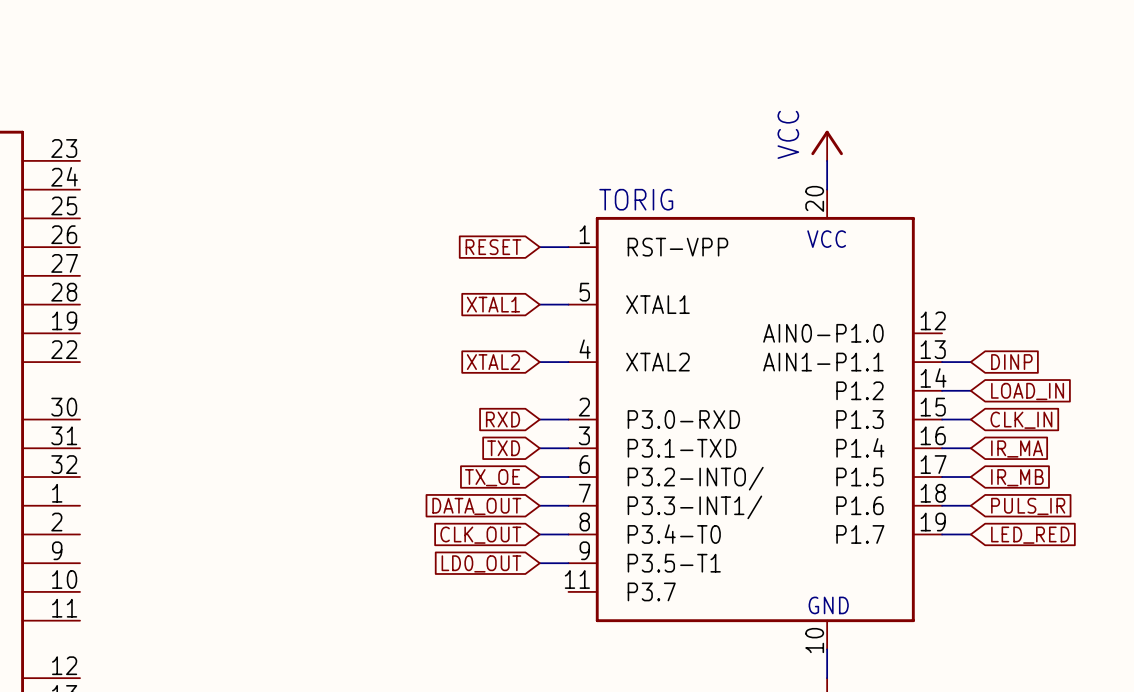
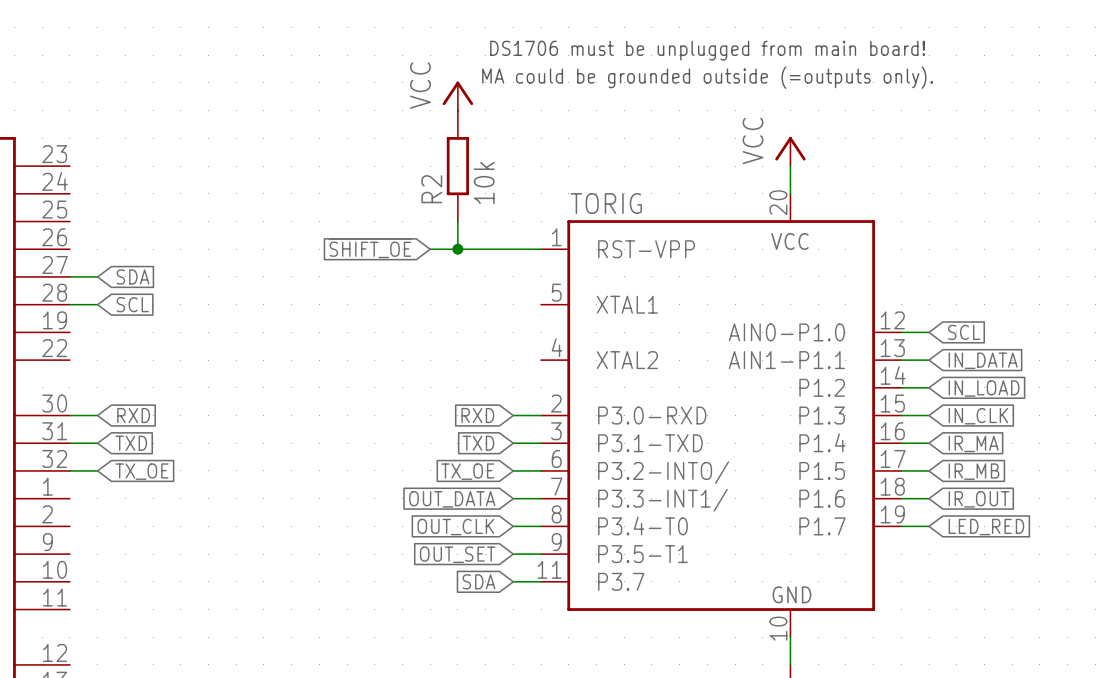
text: none -> DS1706 must be unplugged from main board! (707, 50)
text: none -> MA could be grounded outside (=outputs only). (707, 77)
power symbol: none -> VCC (457, 96)
R2: none -> 10k (457, 166)
wire: none -> (457, 221) (457, 249)
global label: none -> ~{SHIFT_OE} (370, 248)
wire: none -> (430, 249) (513, 249)
junction: none -> (457, 249)
global label: RESET (493, 247) -> none
wire: none -> (69, 276) (97, 276)
global label: none -> SDA (133, 276)
wire: none -> (69, 304) (97, 304)
global label: none -> SCL (132, 304)
global label: XTAL1 (493, 304) -> none
wire: (539, 304) (568, 304) -> none
wire: none -> (901, 332) (929, 332)
global label: none -> SCL (964, 332)
global label: XTAL2 (493, 362) -> none
wire: (539, 362) (568, 362) -> (513, 581) (541, 581)
global label: DINP (1011, 362) -> IN_DATA (983, 360)
global label: LOAD_IN (1027, 391) -> IN_LOAD (984, 388)
wire: none -> (69, 415) (97, 415)
global label: none -> RXD (133, 415)
global label: CLK_IN (1021, 420) -> IN_CLK (978, 416)
wire: none -> (69, 443) (97, 443)
global label: none -> TXD (131, 443)
wire: none -> (69, 470) (97, 470)
global label: none -> TX_OE (141, 471)
global label: DATA_OUT (476, 506) -> OUT_DATA (452, 499)
global label: PULS_IR (1028, 506) -> IR_OUT (979, 499)
global label: CLK_OUT (480, 535) -> OUT_CLK (455, 527)
global label: LD0_OUT (481, 563) -> OUT_SET (457, 554)
global label: none -> SDA (479, 581)

